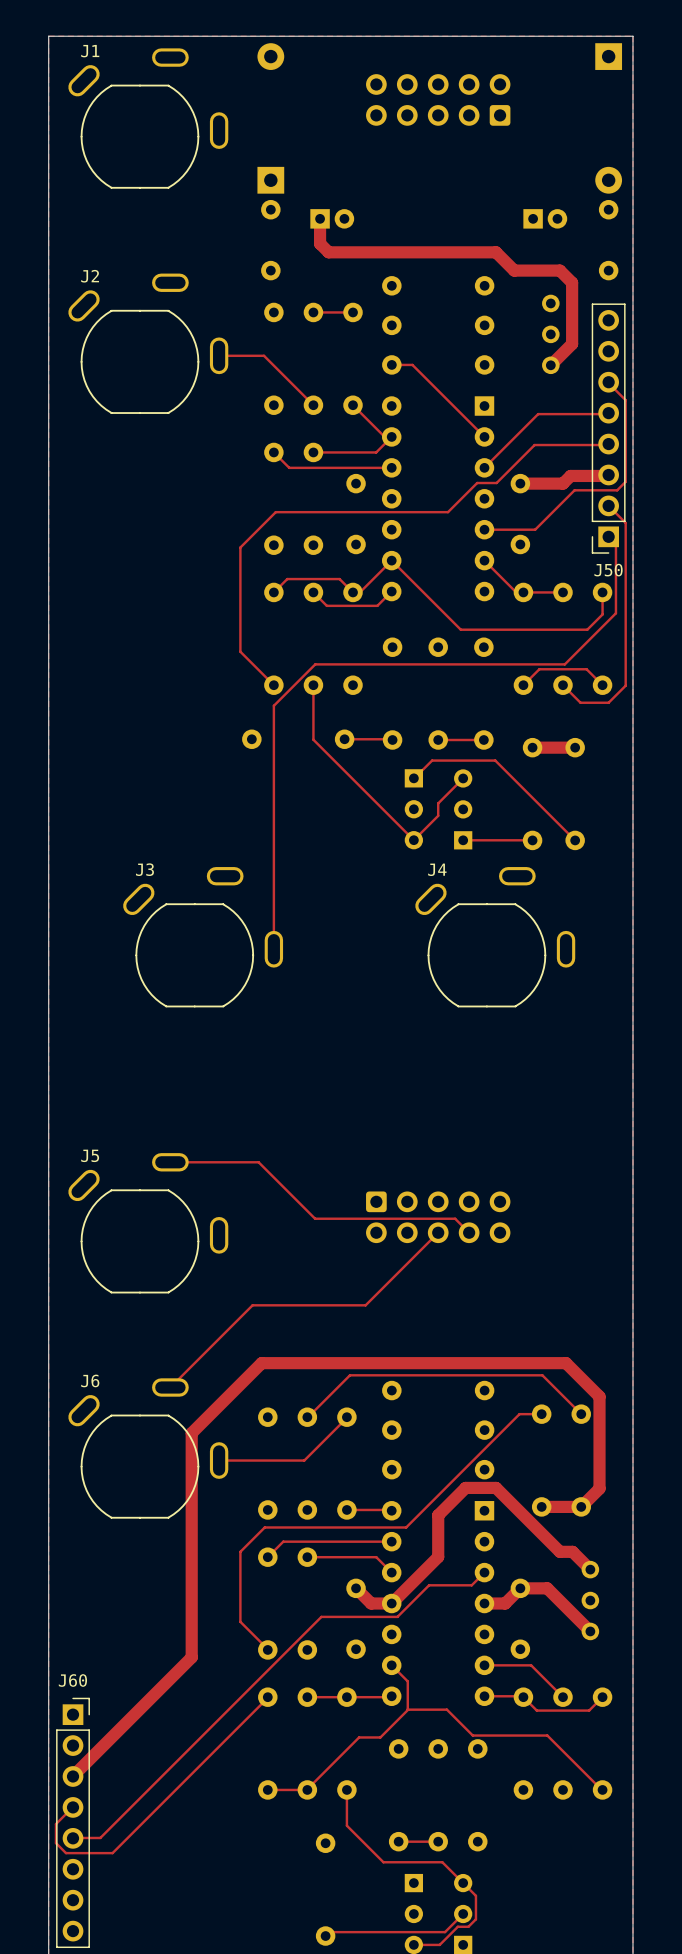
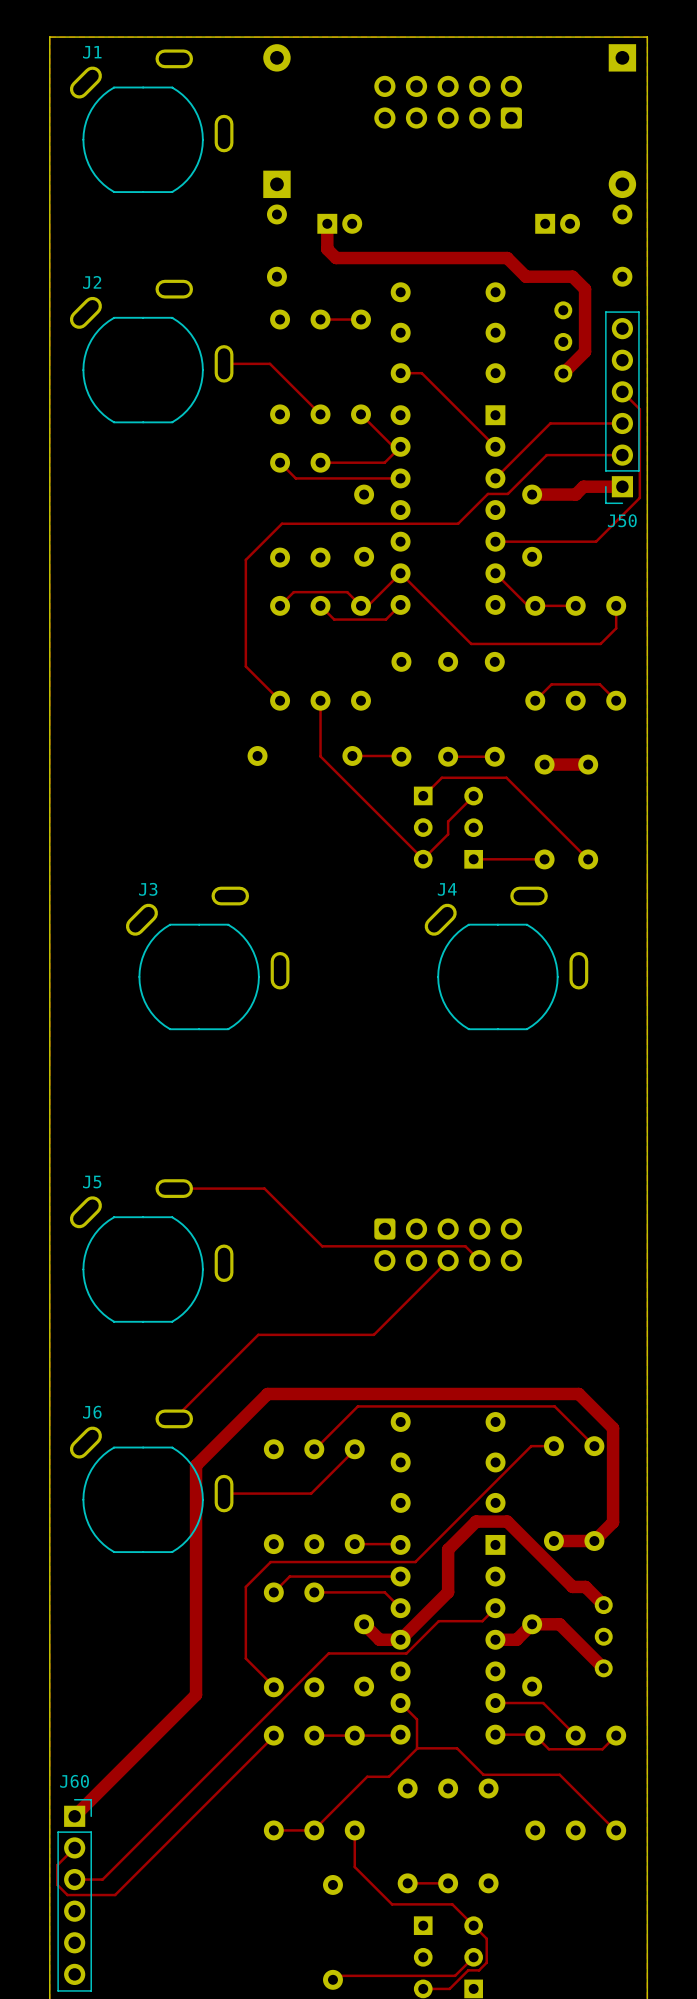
J50 footprint: [591, 303, 626, 554] -> [605, 311, 640, 505]
track: (625, 481) (617, 490) (574, 490) (535, 529) -> (639, 492) (639, 497) (596, 541) (547, 541)
track: (611, 508) (625, 522) (625, 685) (608, 702) (580, 702) (562, 685) -> none
track: (608, 536) (615, 544) (615, 613) (564, 664) (315, 664) (273, 705) (273, 949) -> none
J50 name position: J50 (608, 570) -> J50 (622, 520)
J60 name position: J60 (72, 1680) -> J60 (74, 1781)
J60 footprint: [56, 1697, 90, 1949] -> [57, 1799, 92, 1992]

